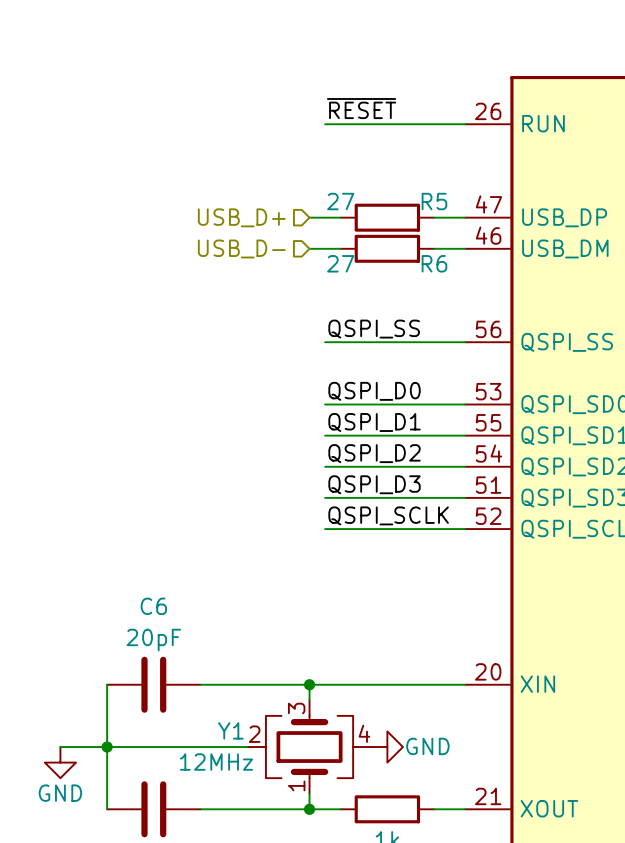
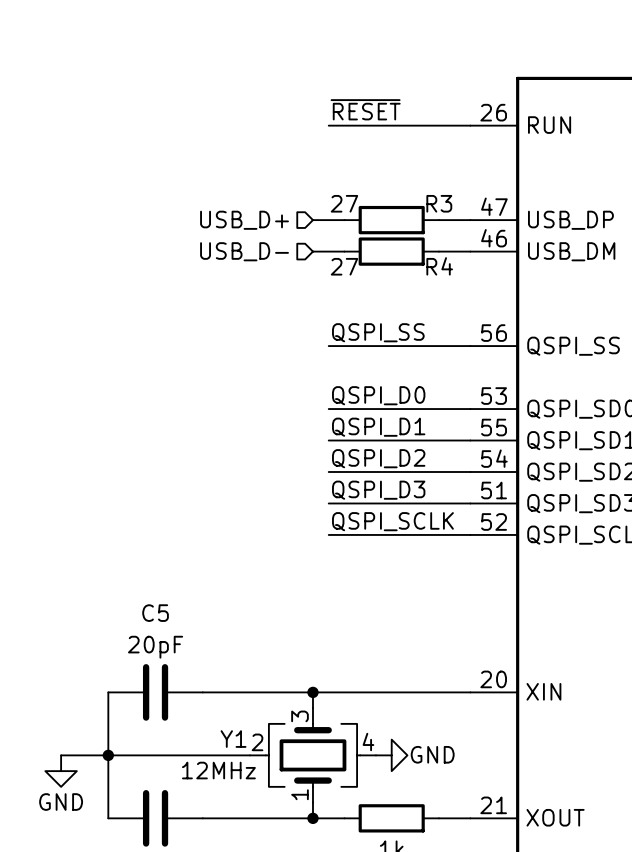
R5 name: R5 (434, 201) -> R3 (439, 203)
R6 name: R6 (434, 263) -> R4 (439, 266)
C6 name: C6 (153, 606) -> C5 (155, 613)

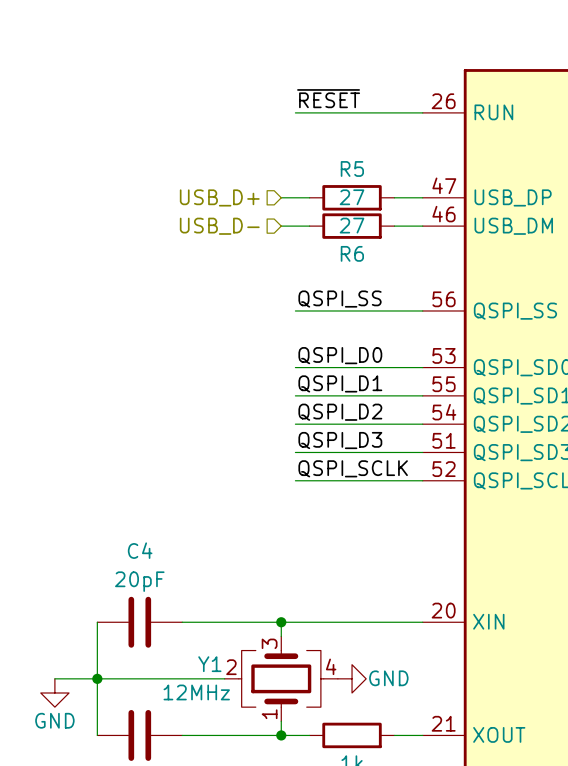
R3 value position: 27 (344, 203) -> 27 (352, 197)
R3 name: R3 (439, 203) -> R5 (352, 168)
R4 value position: 27 (344, 266) -> 27 (352, 225)
R4 name: R4 (439, 266) -> R6 (352, 253)
C5 name: C5 (155, 613) -> C4 (140, 550)

